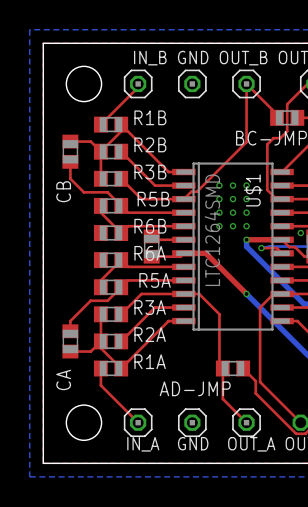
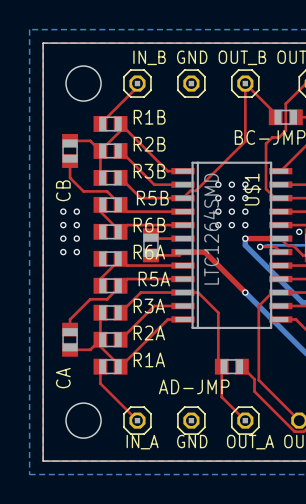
via: none -> (63, 211)
via: none -> (76, 211)
via: none -> (63, 225)
via: none -> (76, 225)
via: none -> (63, 238)
via: none -> (76, 238)
via: none -> (63, 252)
via: none -> (76, 252)

